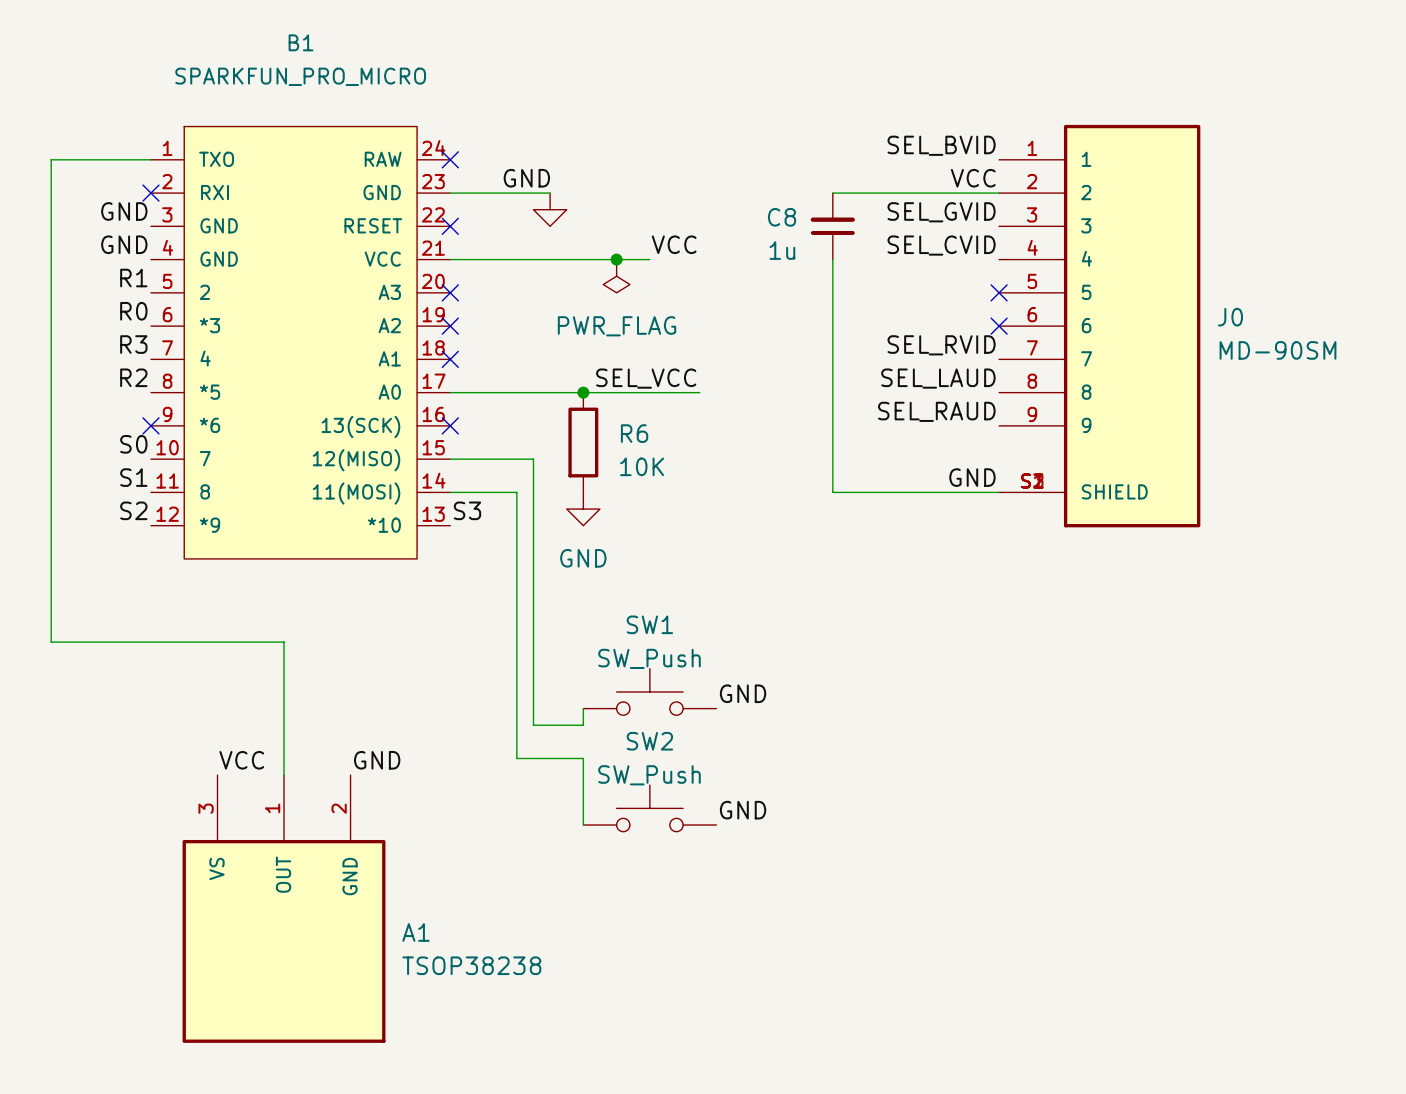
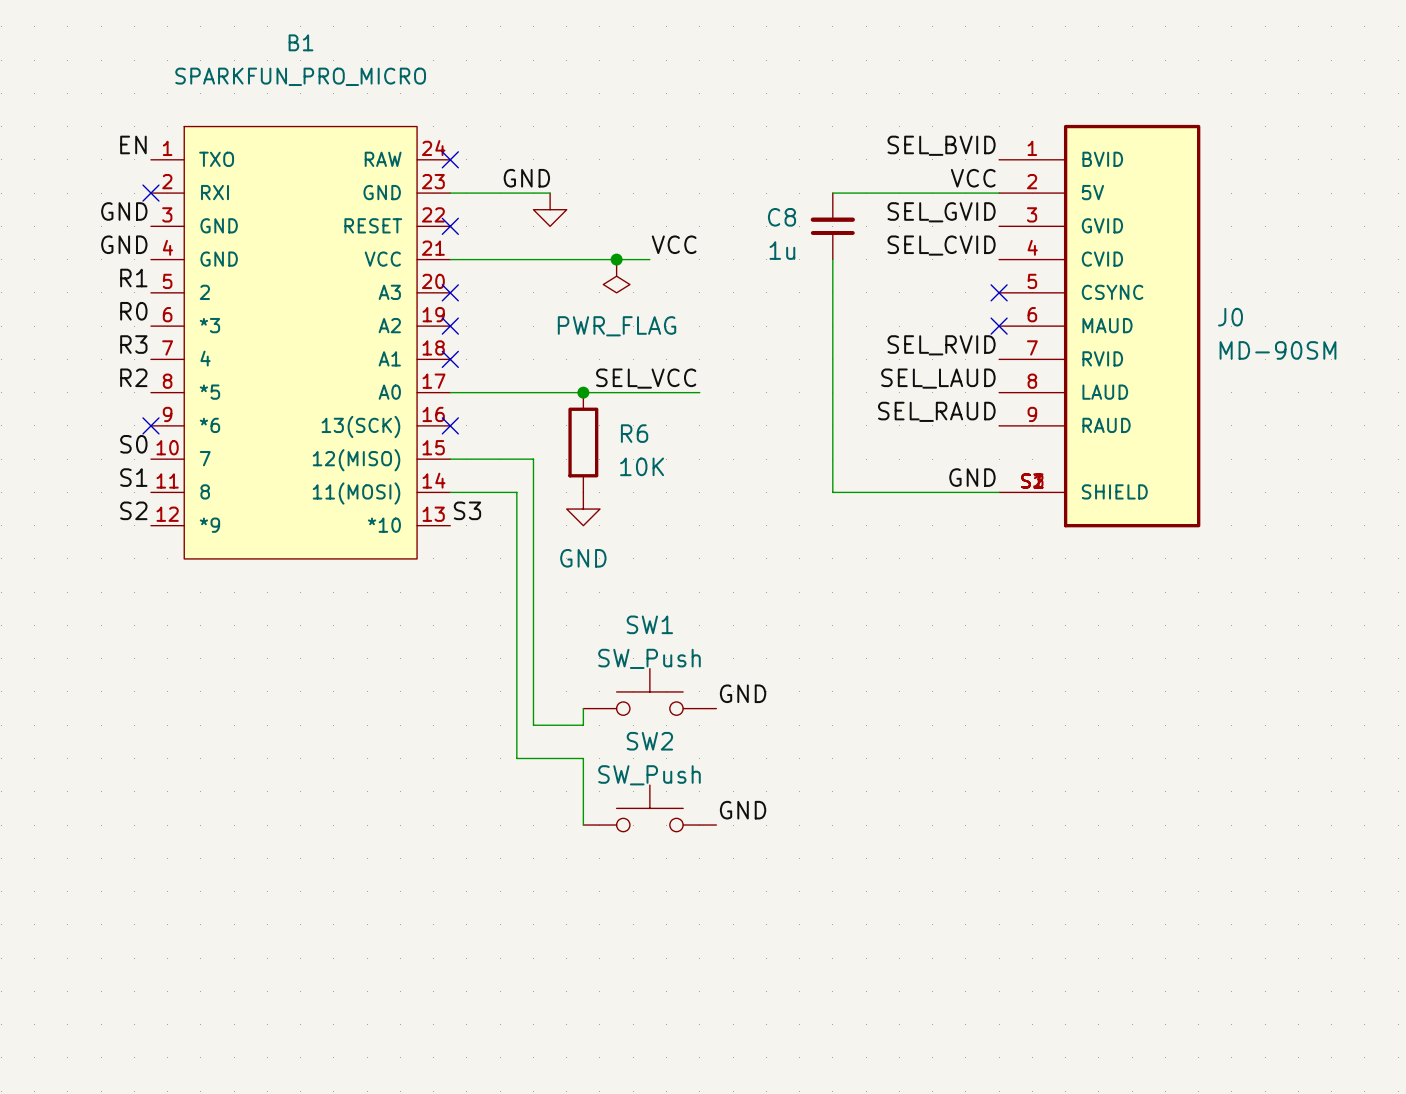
J0 symbol: [999, 124, 1201, 528] -> [999, 124, 1201, 528]
label: none -> EN (133, 144)
wire: (150, 159) (51, 159) (51, 642) (284, 642) (284, 775) -> none
label: VCC (241, 760) -> none
label: GND (377, 760) -> none
A1: TSOP38238 (284, 908) -> none

